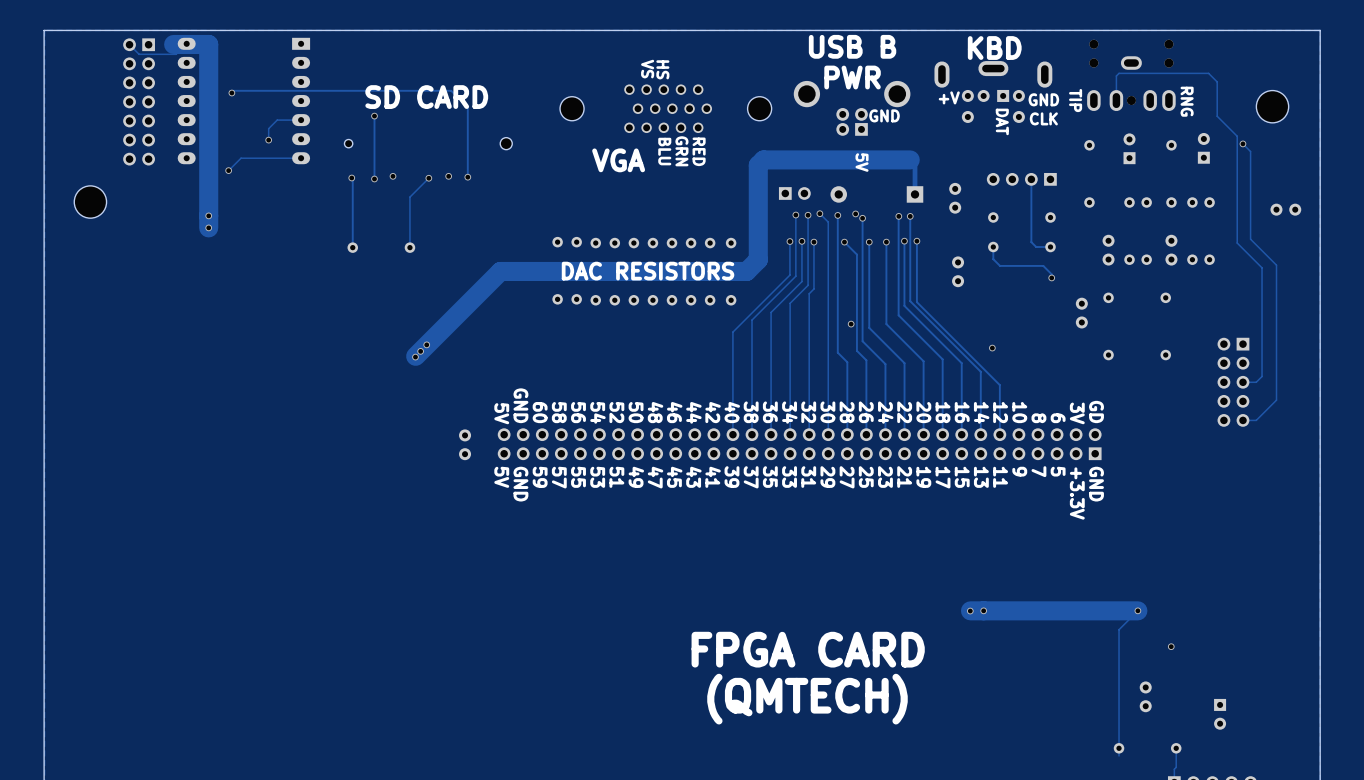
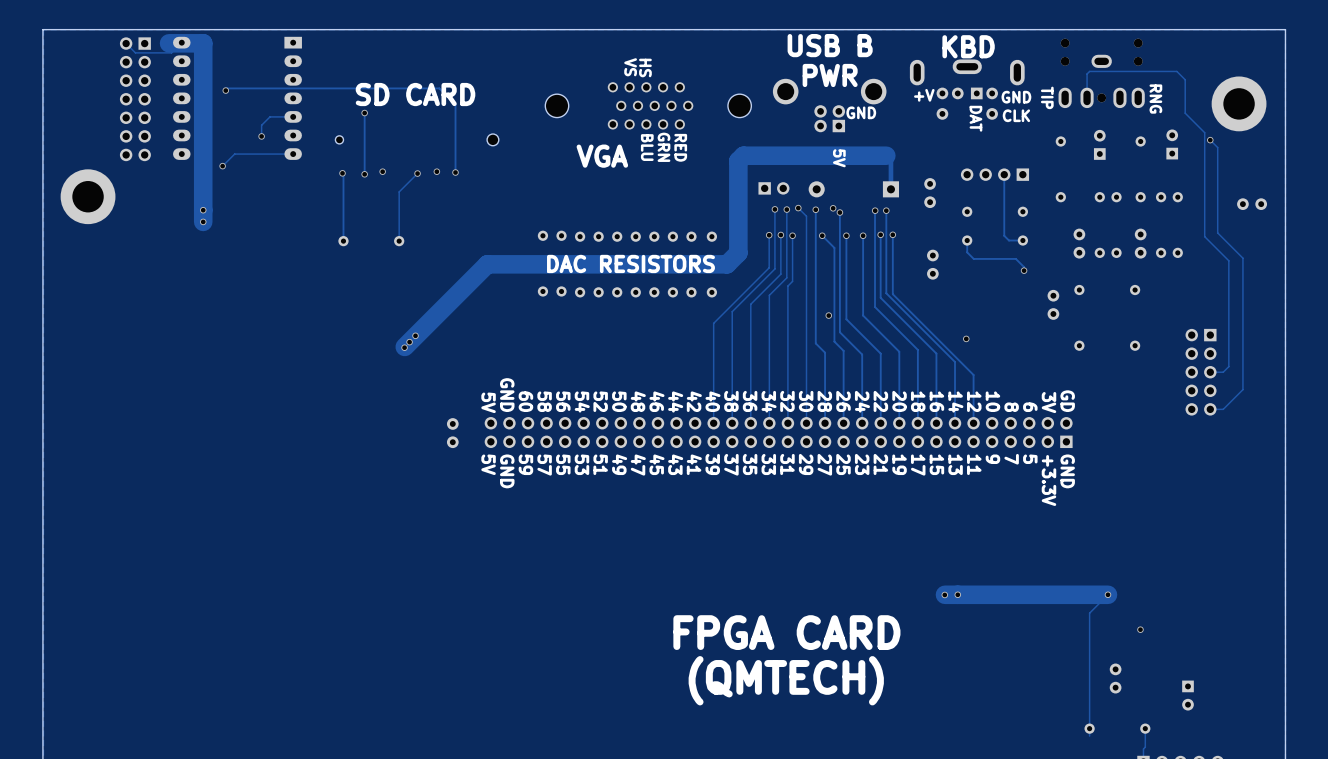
part footprint: [1256, 90, 1289, 123] -> [1211, 76, 1267, 132]
part footprint: [74, 185, 107, 219] -> [60, 169, 116, 225]

